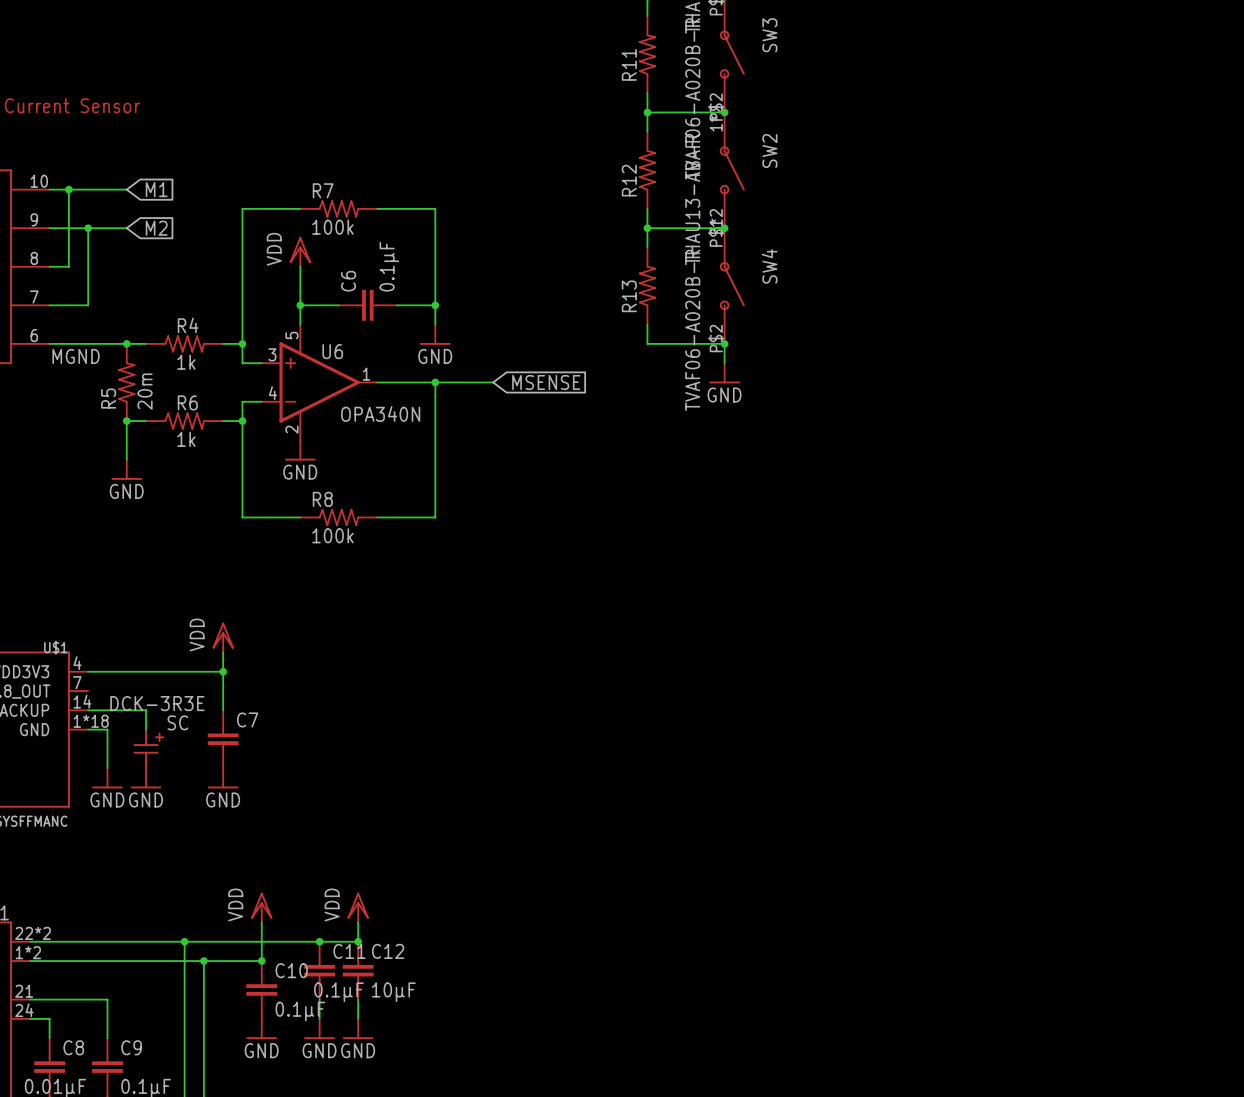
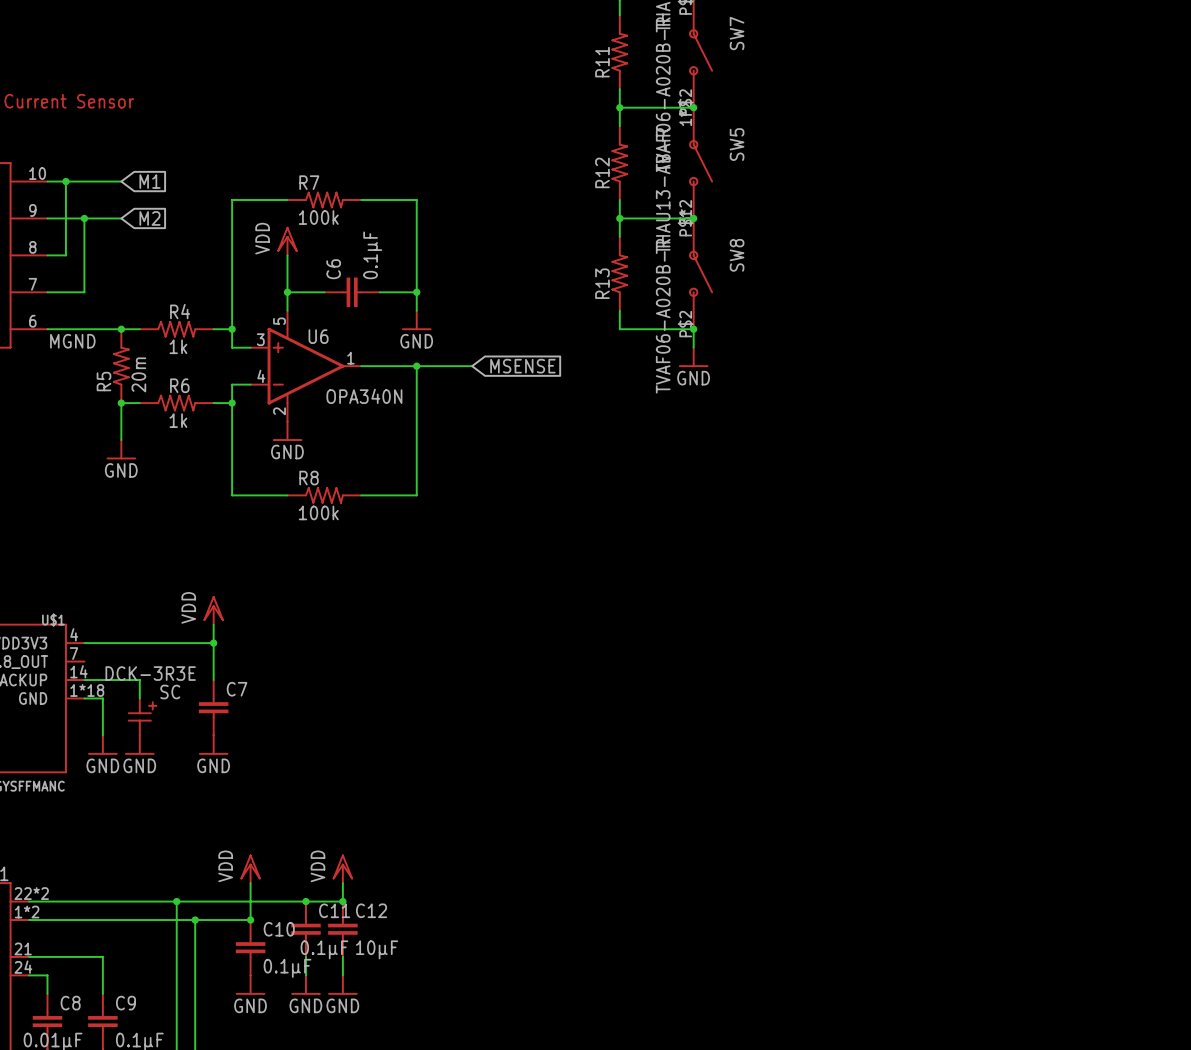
SW3 name: SW3 (769, 35) -> SW7 (737, 33)
SW2 name: SW2 (769, 151) -> SW5 (737, 144)
SW4 name: SW4 (769, 266) -> SW8 (737, 255)

